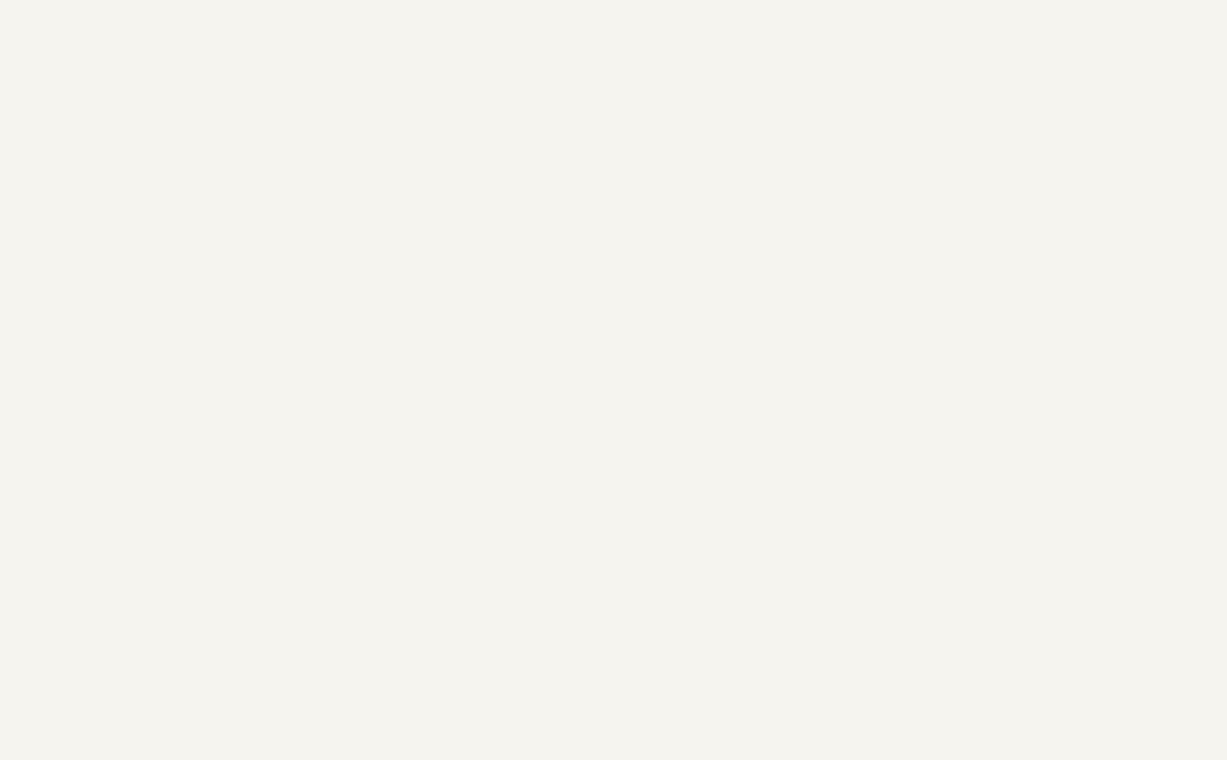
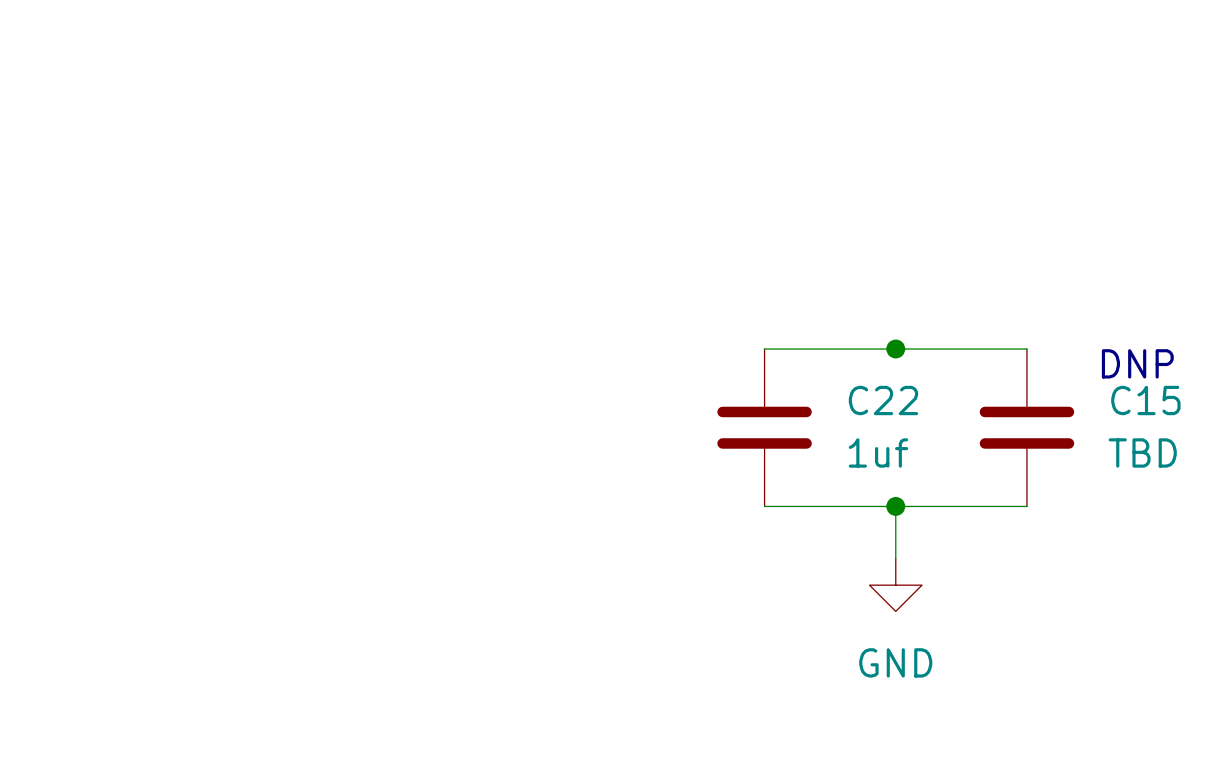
wire: none -> (764, 349) (1026, 349)
junction: none -> (895, 349)
text: none -> DNP (1137, 363)
C22: none -> 1uf (764, 427)
C15: none -> TBD (1026, 427)
wire: none -> (764, 506) (1026, 506)
wire: none -> (895, 506) (895, 558)
junction: none -> (895, 506)
power symbol: none -> GND (895, 585)

